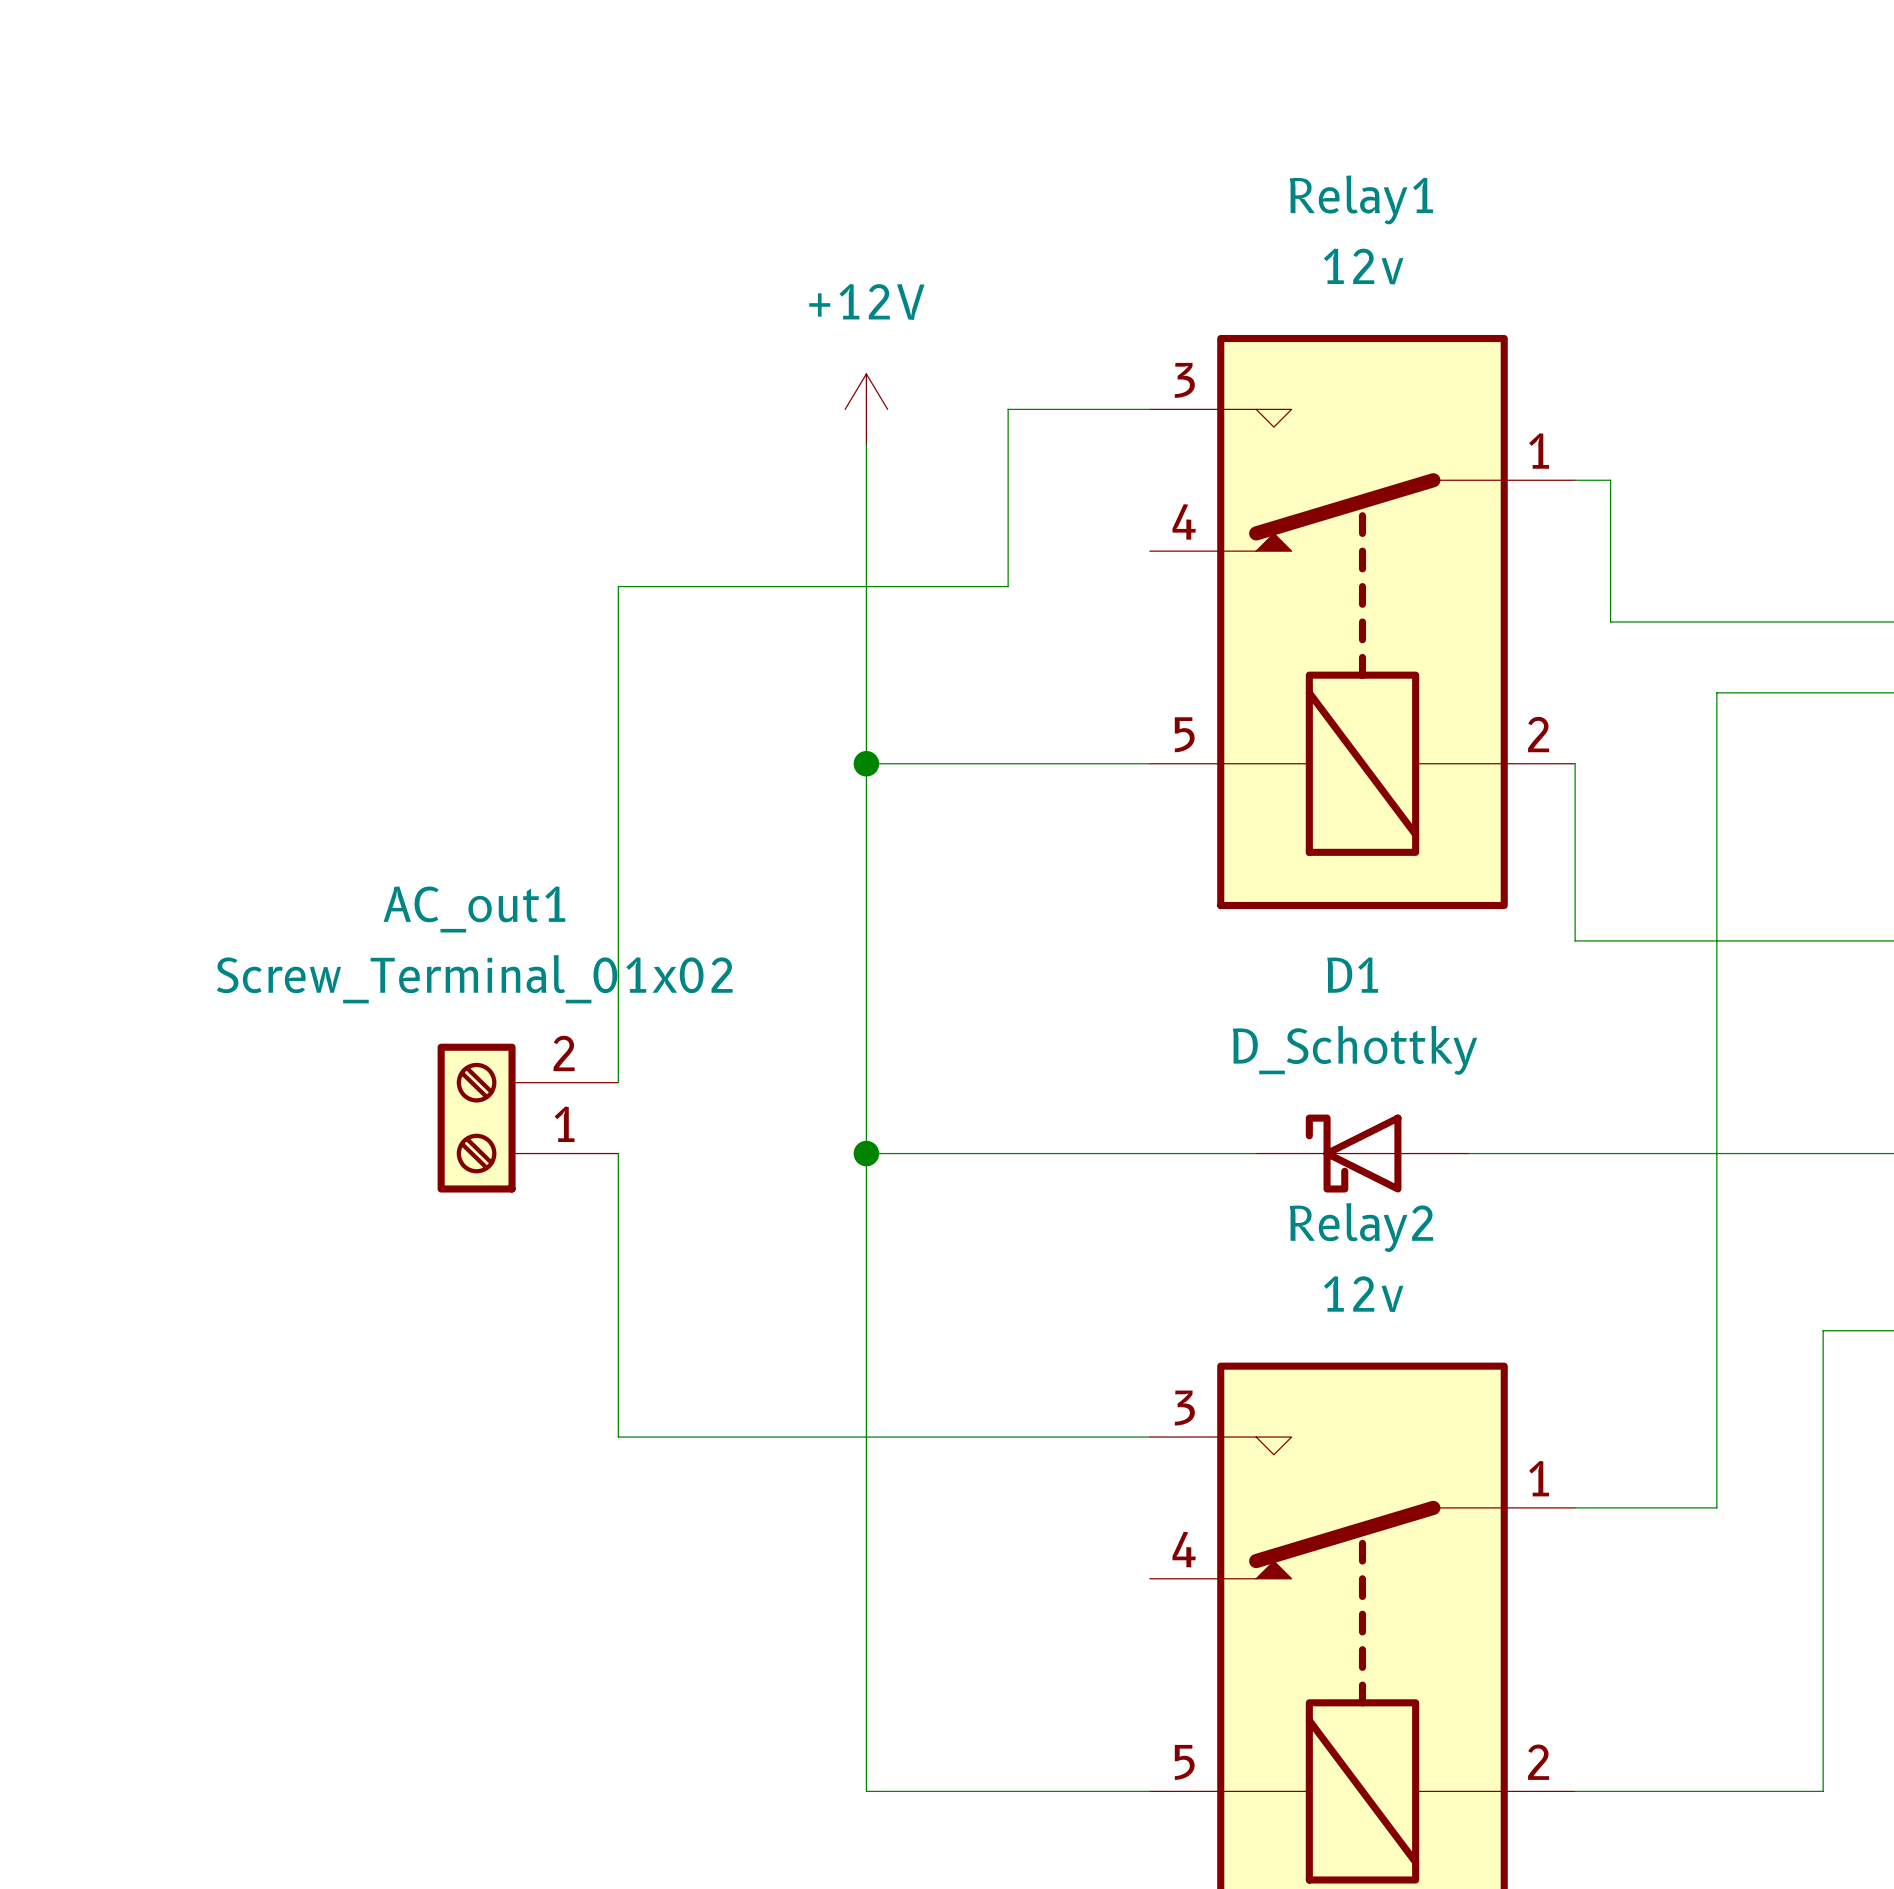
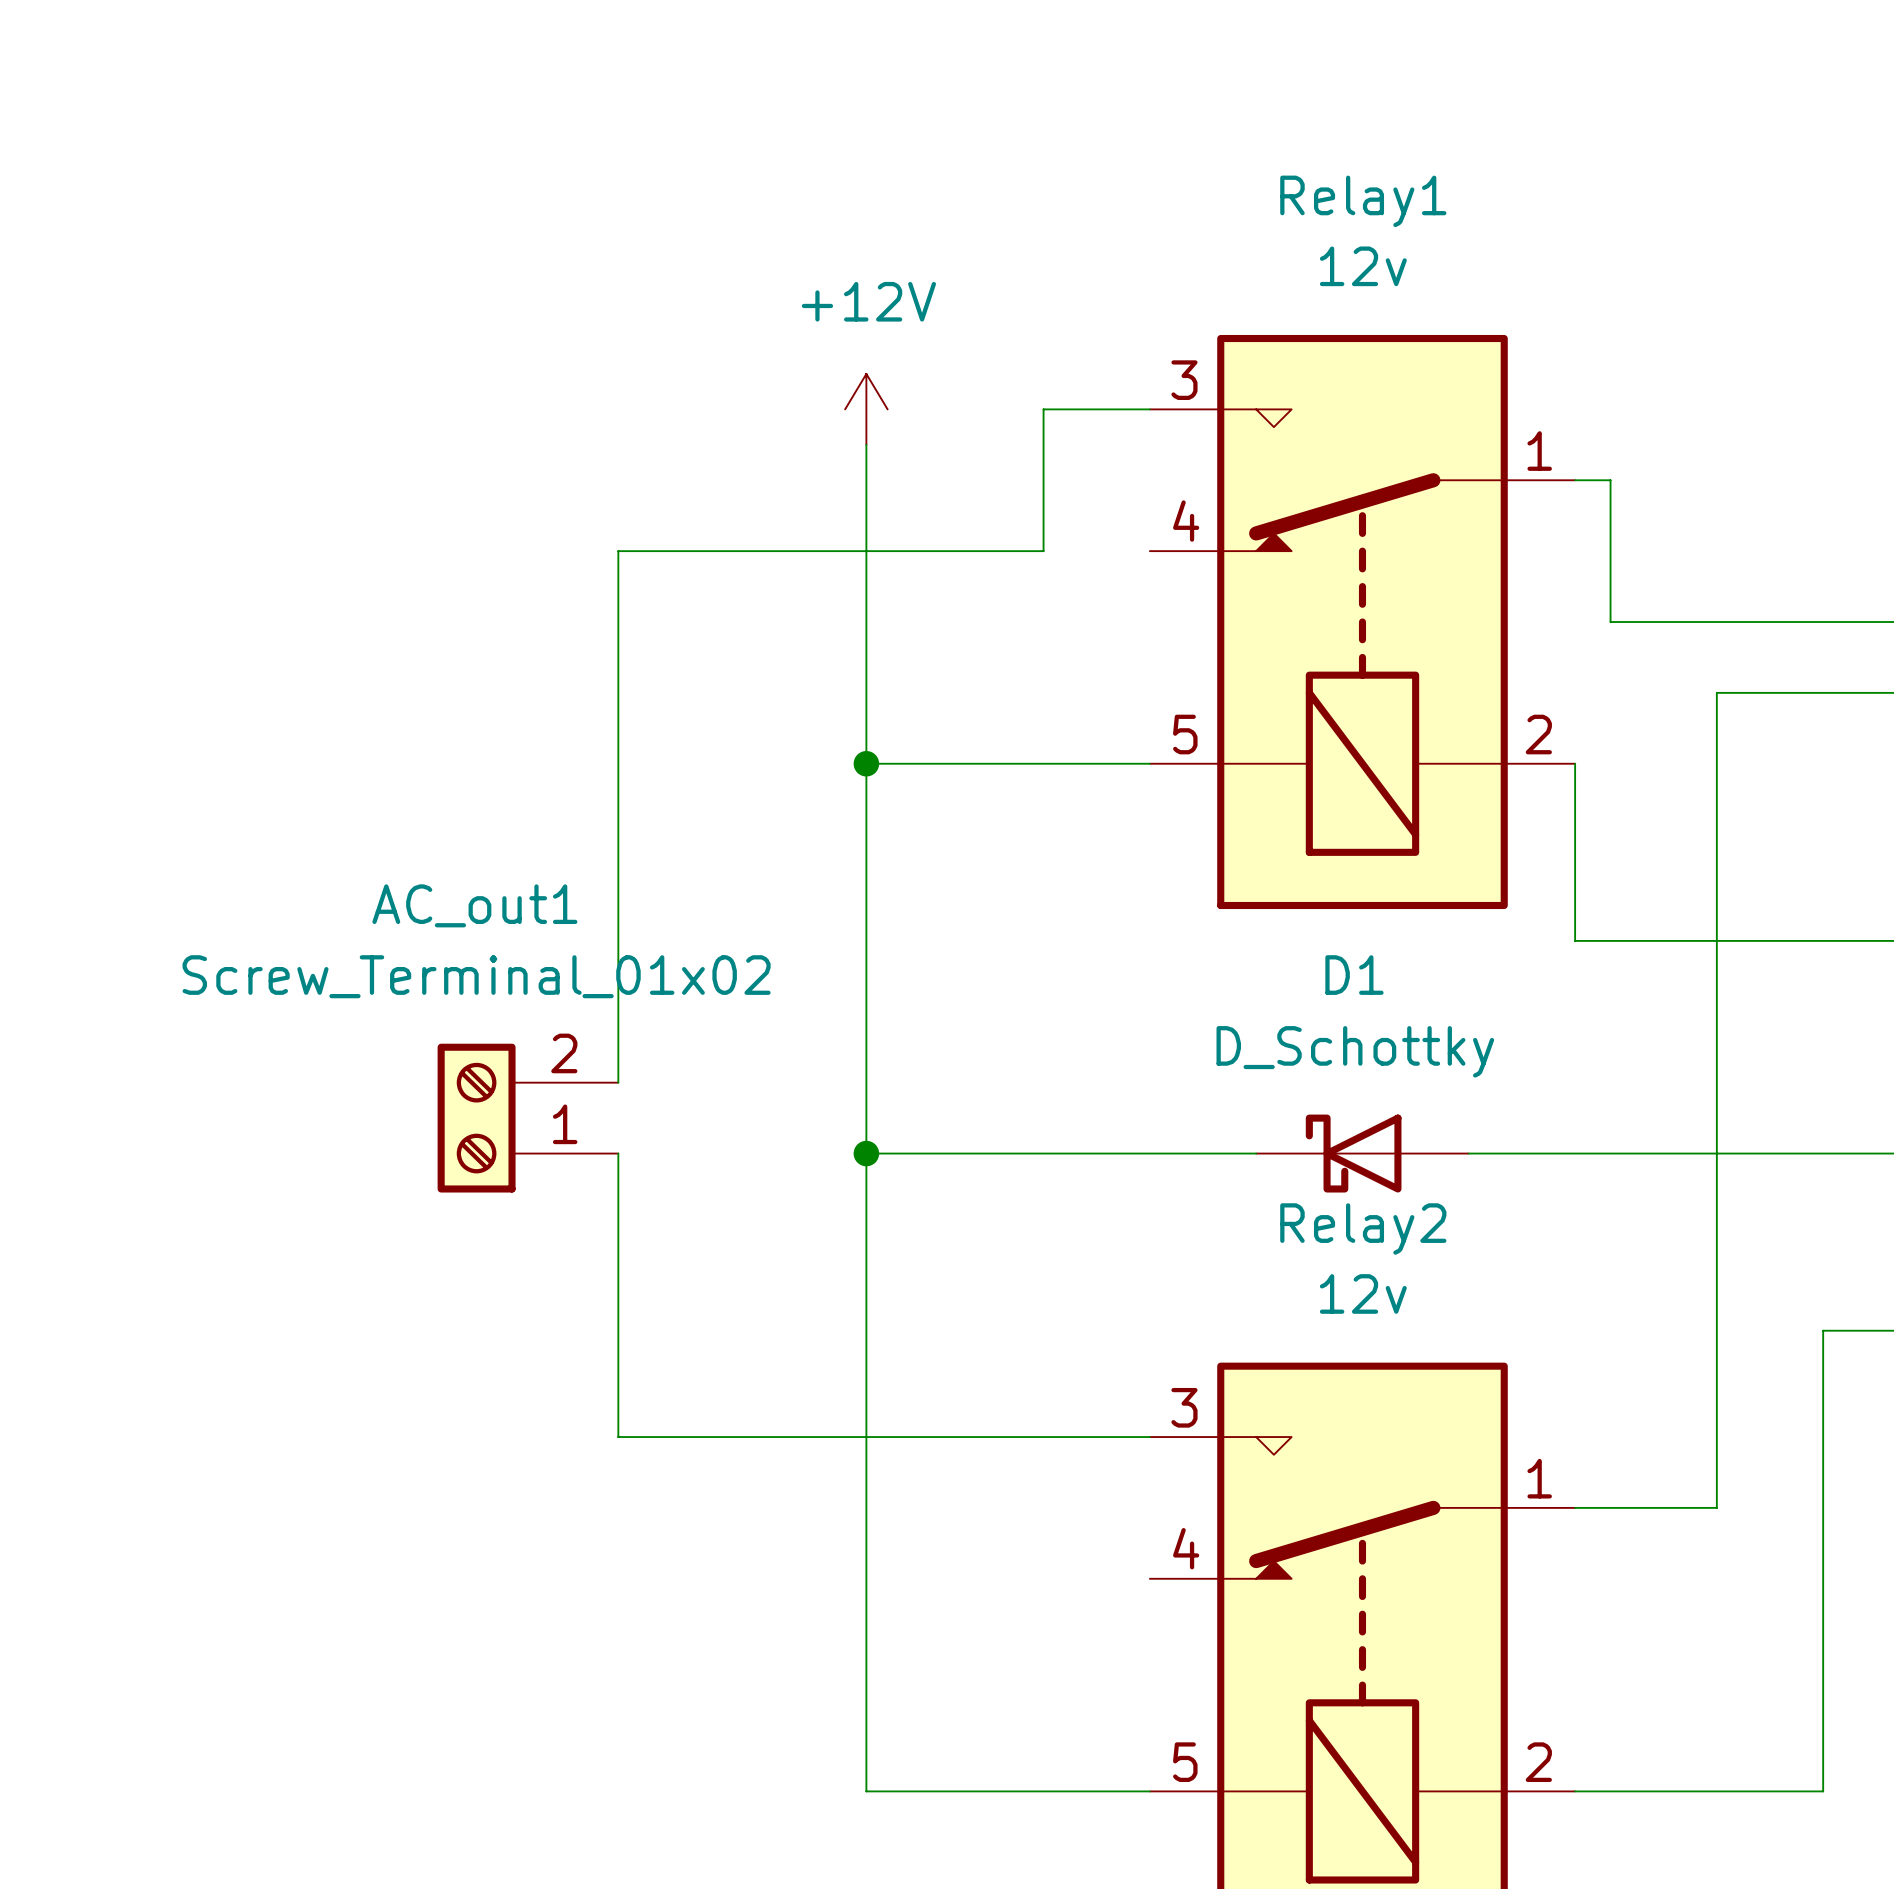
wire: (1043, 409) (1008, 409) (1008, 586) (618, 586) -> (1043, 409) (1043, 551) (618, 551) (618, 586)

